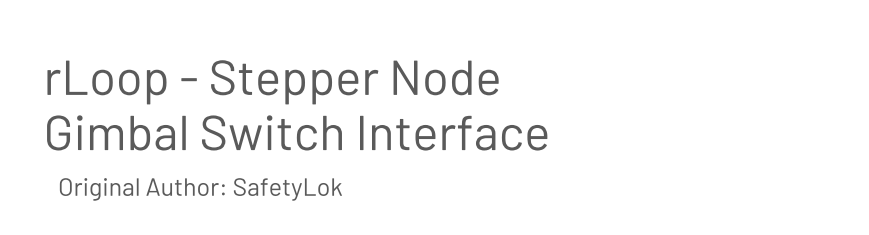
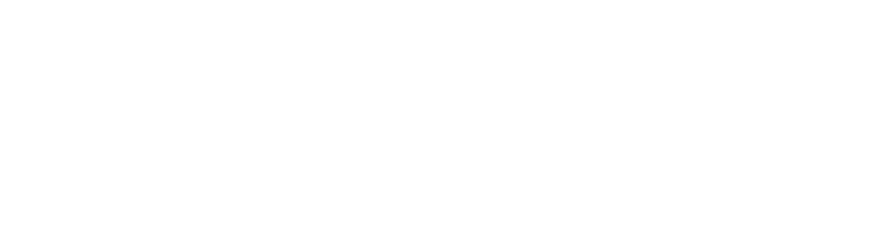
text: rLoop - Stepper Node (273, 82) -> none
text: Gimbal Switch Interface (297, 132) -> none
text: Original Author: SafetyLok (200, 189) -> none

